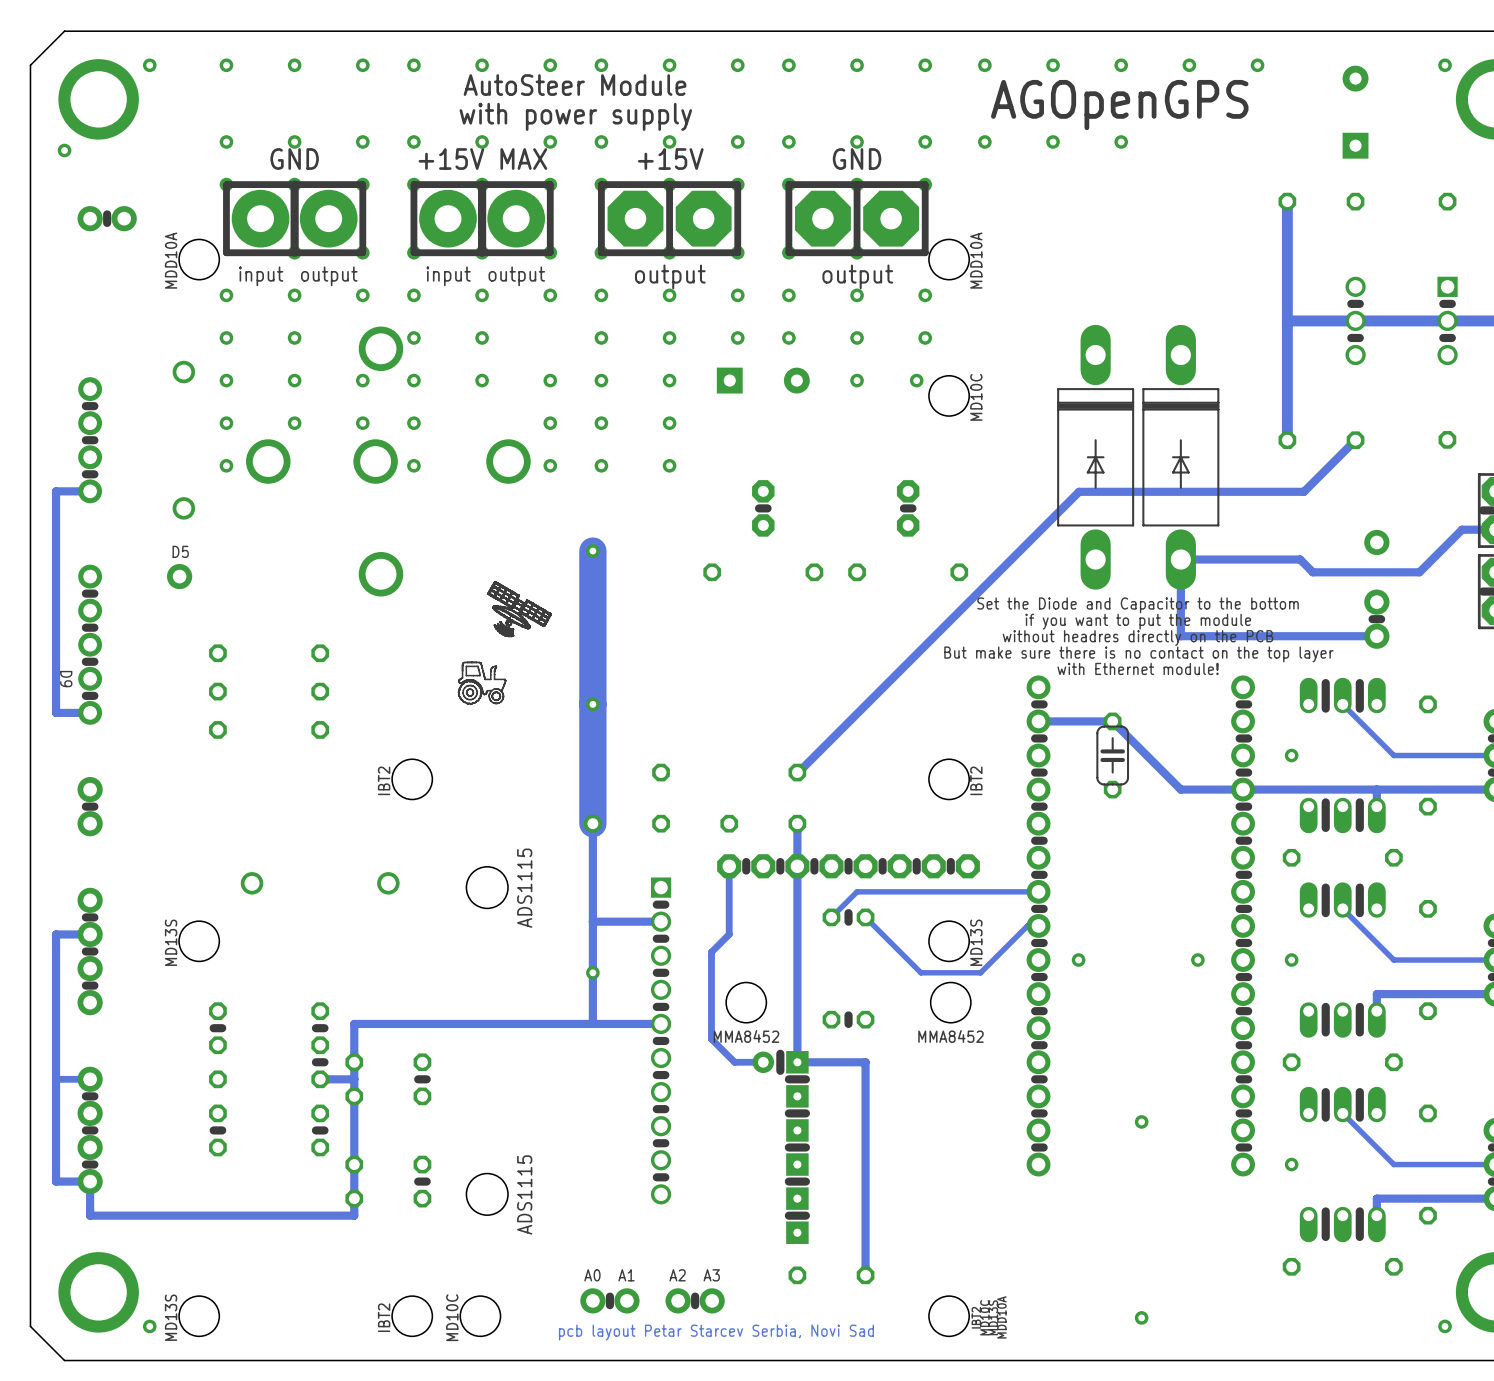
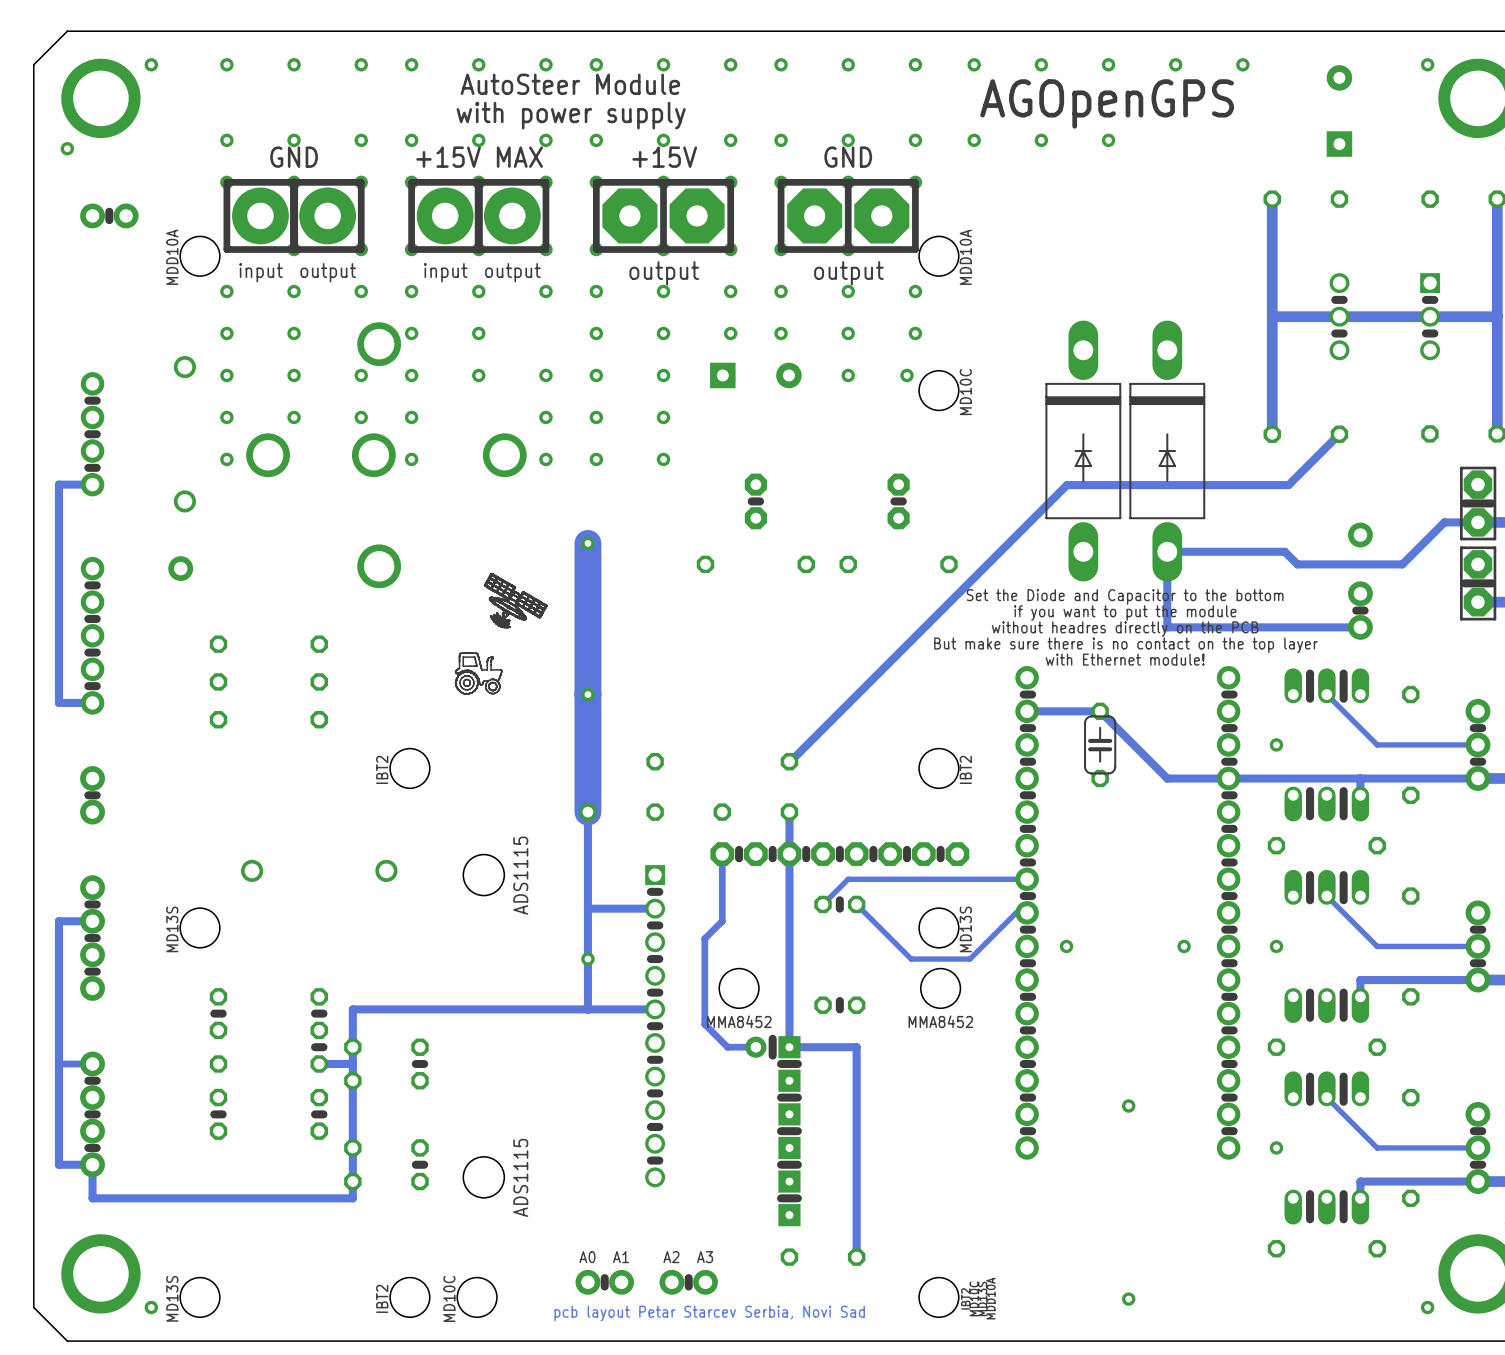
text: D5 (180, 551) -> none
text: D9 (66, 679) -> none

